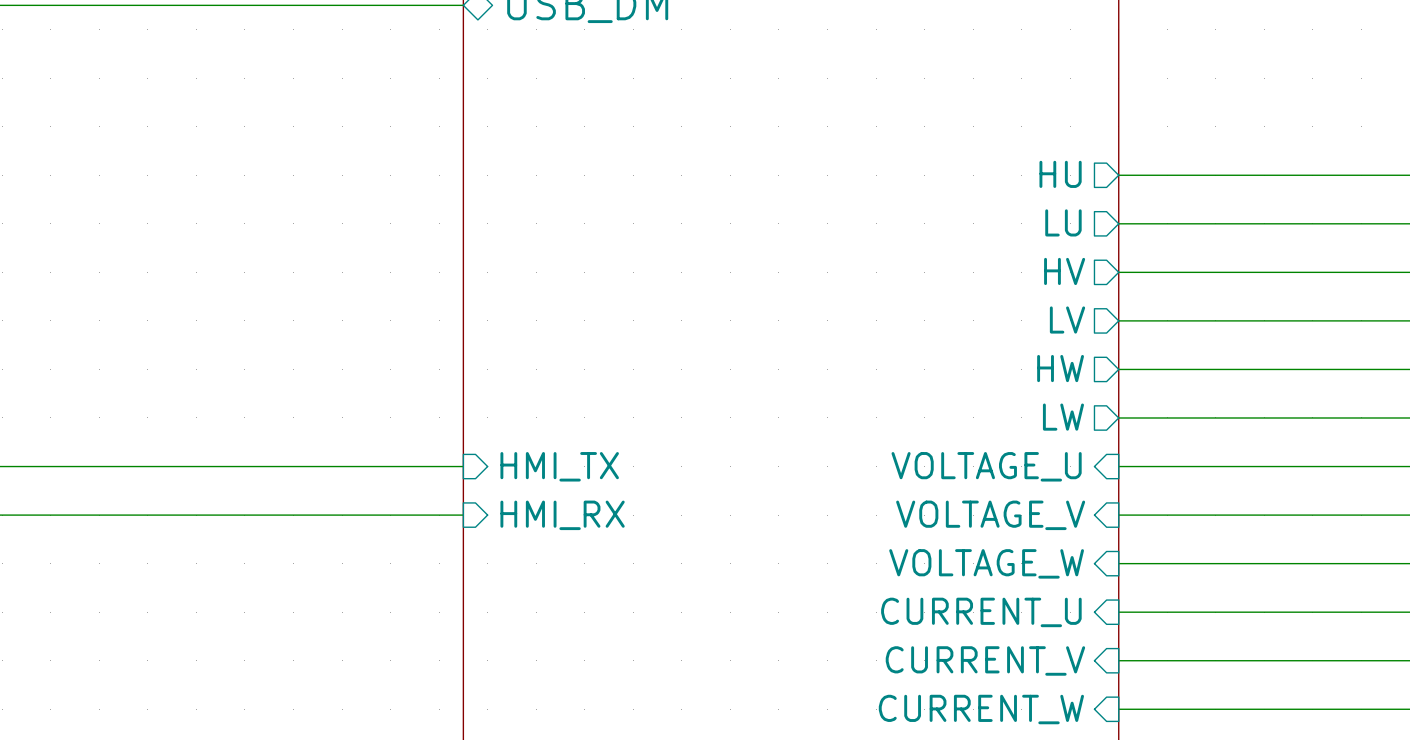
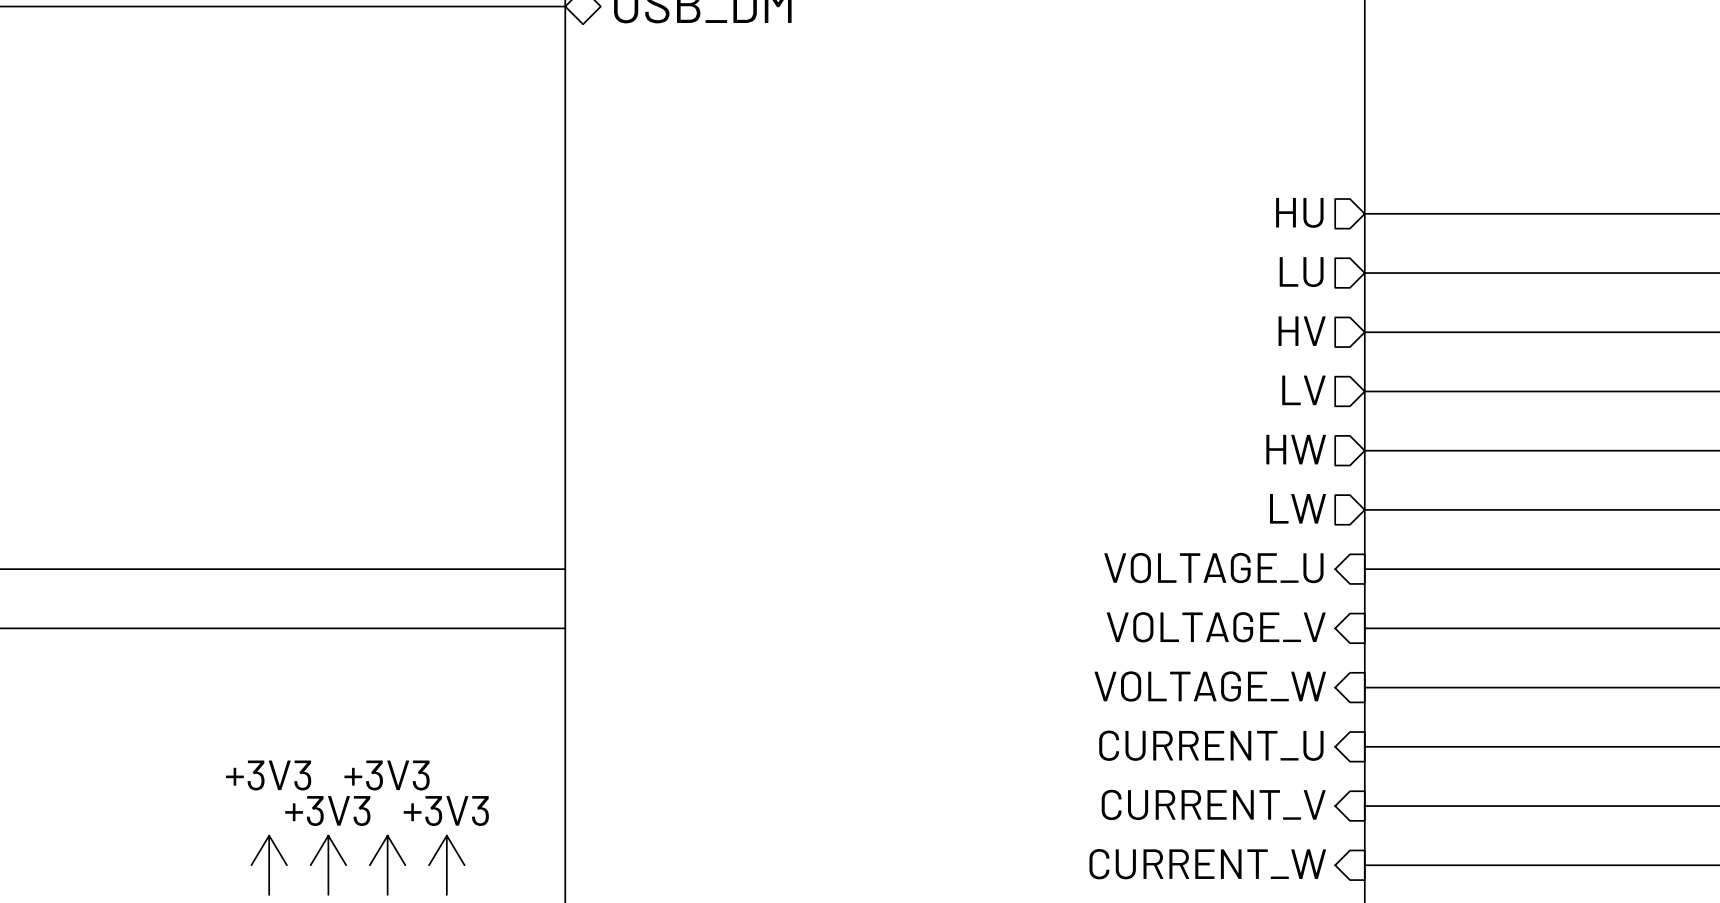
sheet pin: HMI_TX (559, 466) -> none
sheet pin: HMI_RX (562, 515) -> none
power symbol: none -> +3V3 (269, 865)
power symbol: none -> +3V3 (328, 865)
power symbol: none -> +3V3 (387, 865)
power symbol: none -> +3V3 (446, 865)

